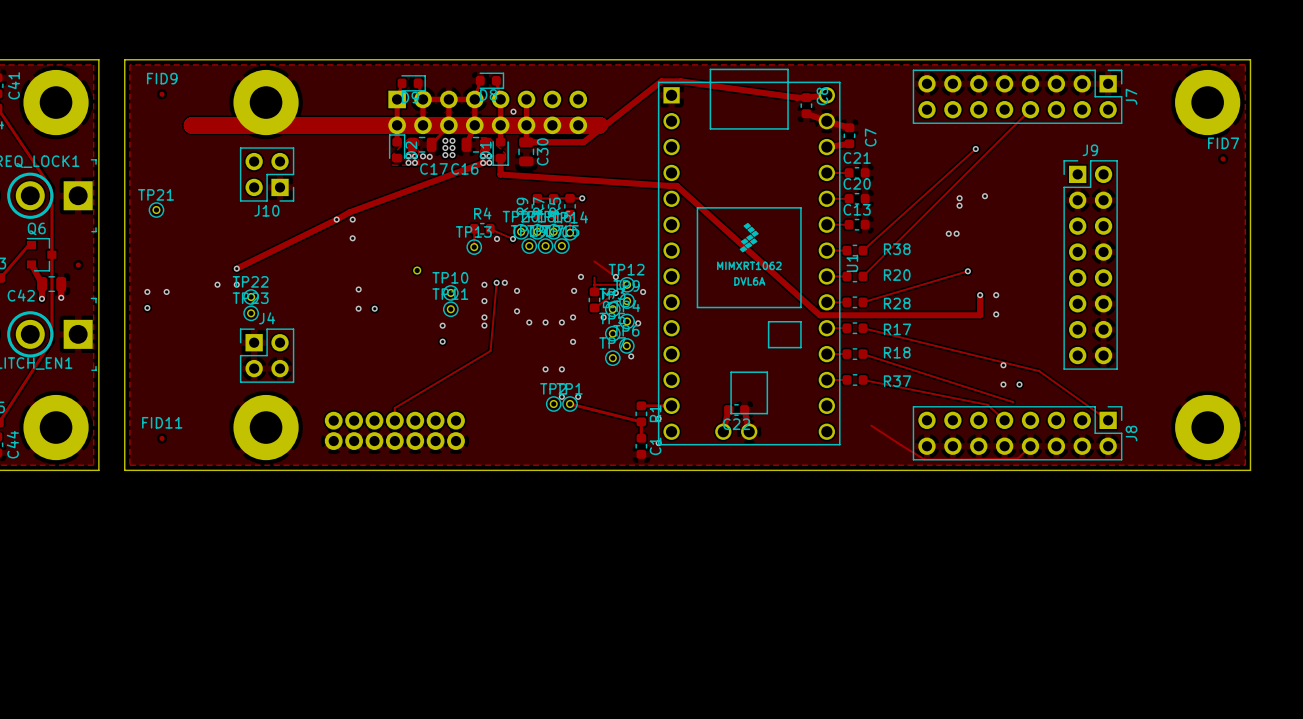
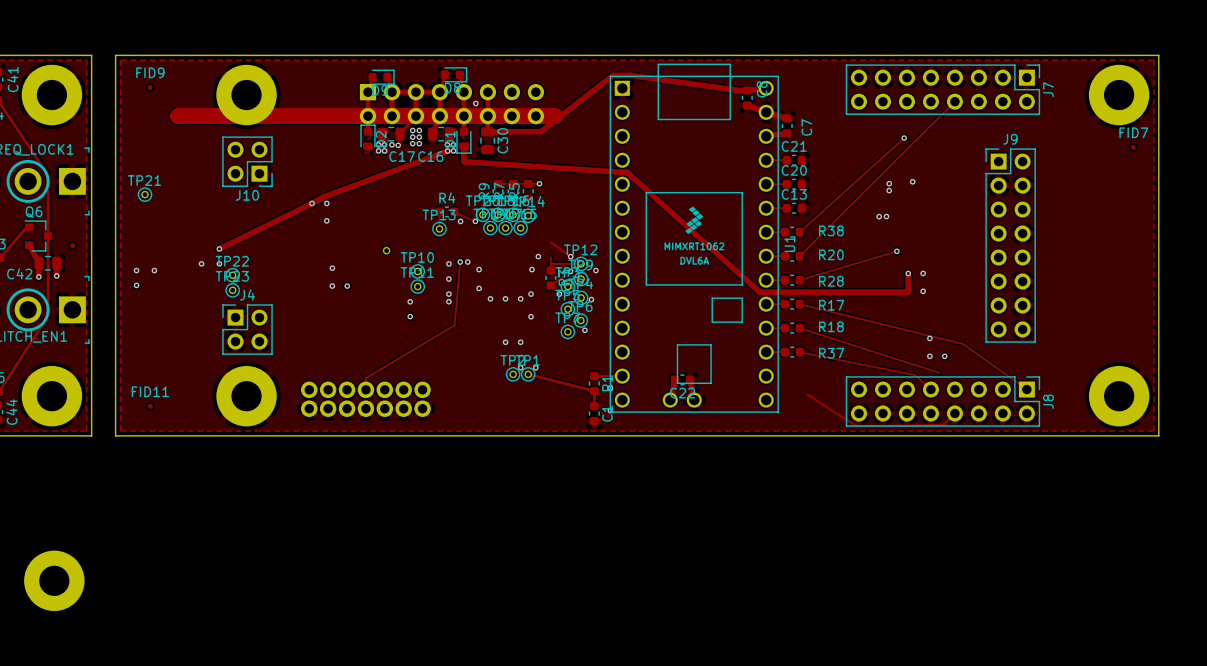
part: none -> (54, 580)

